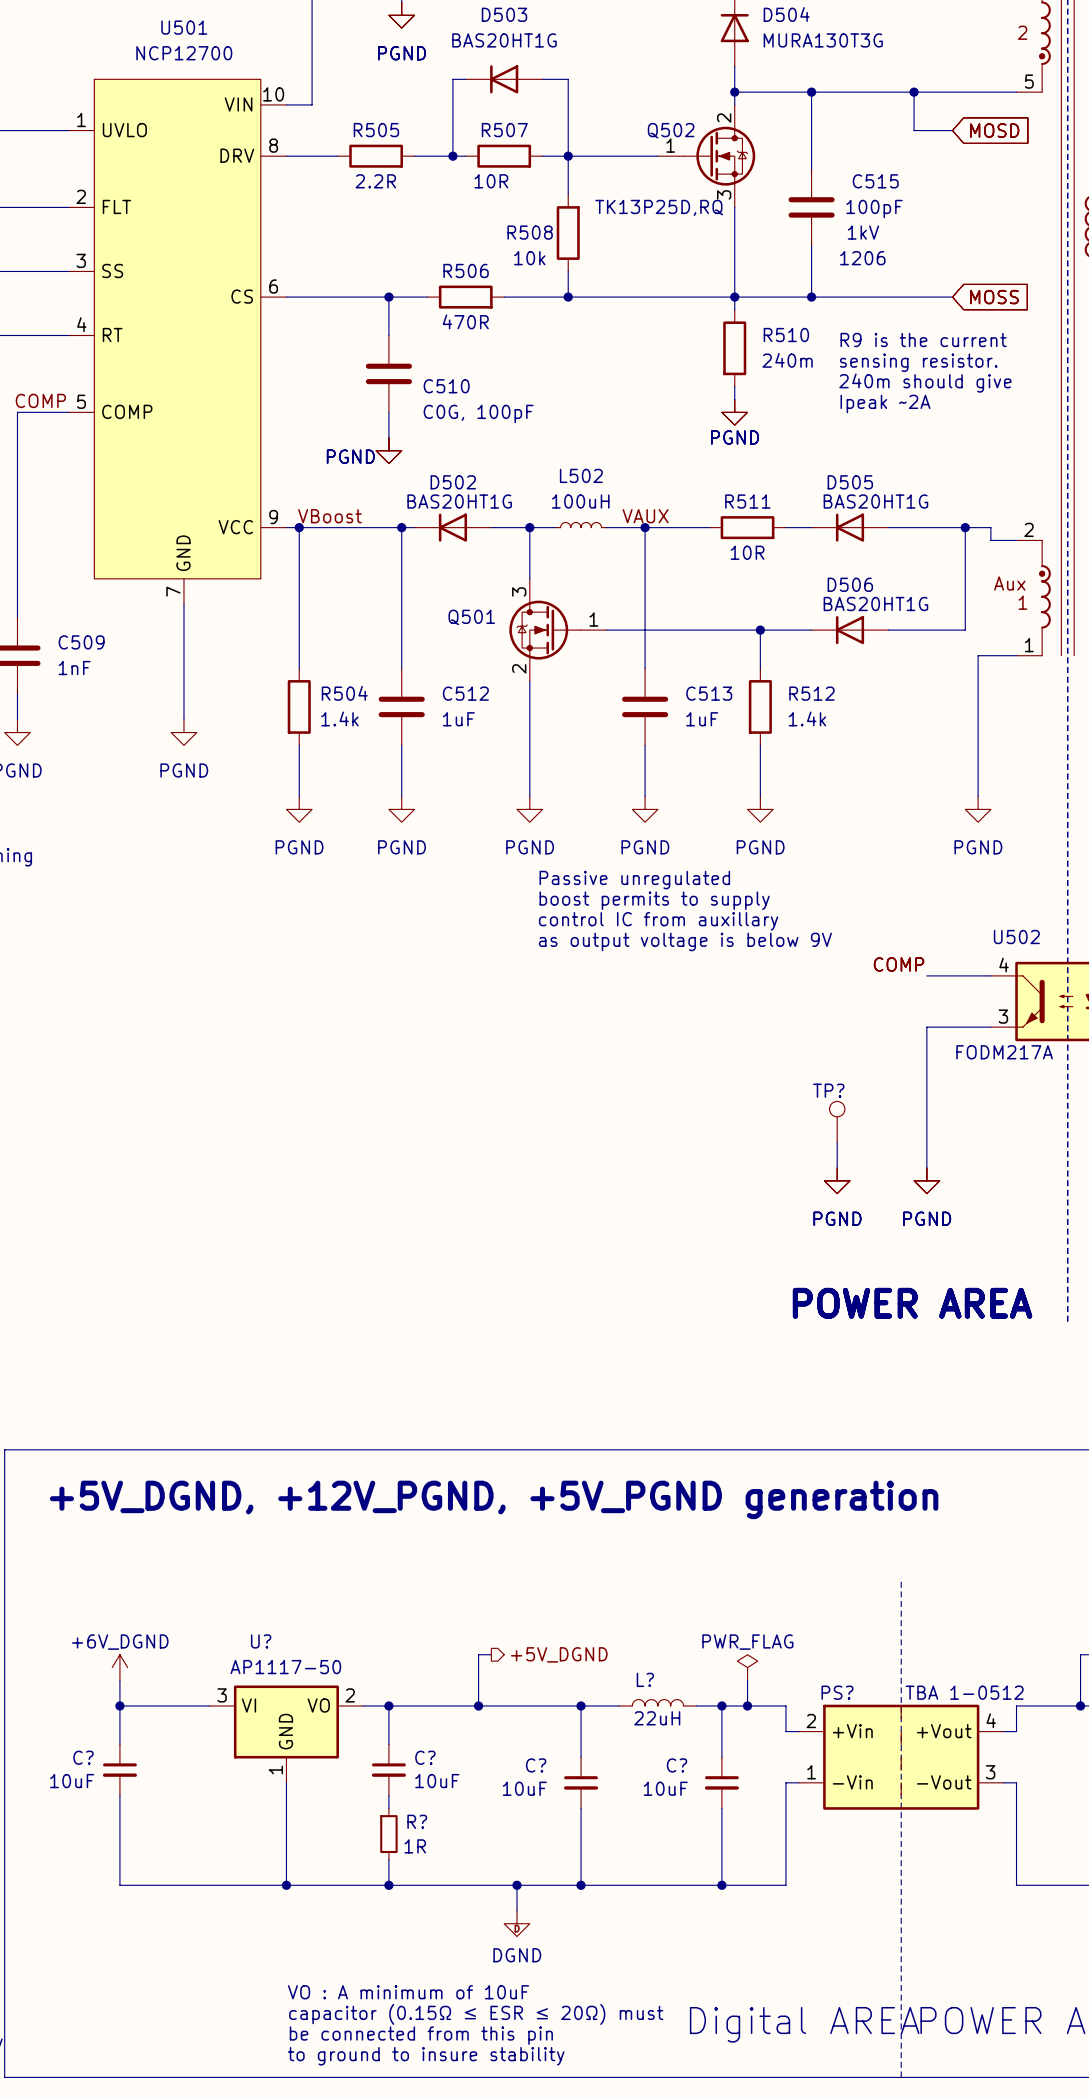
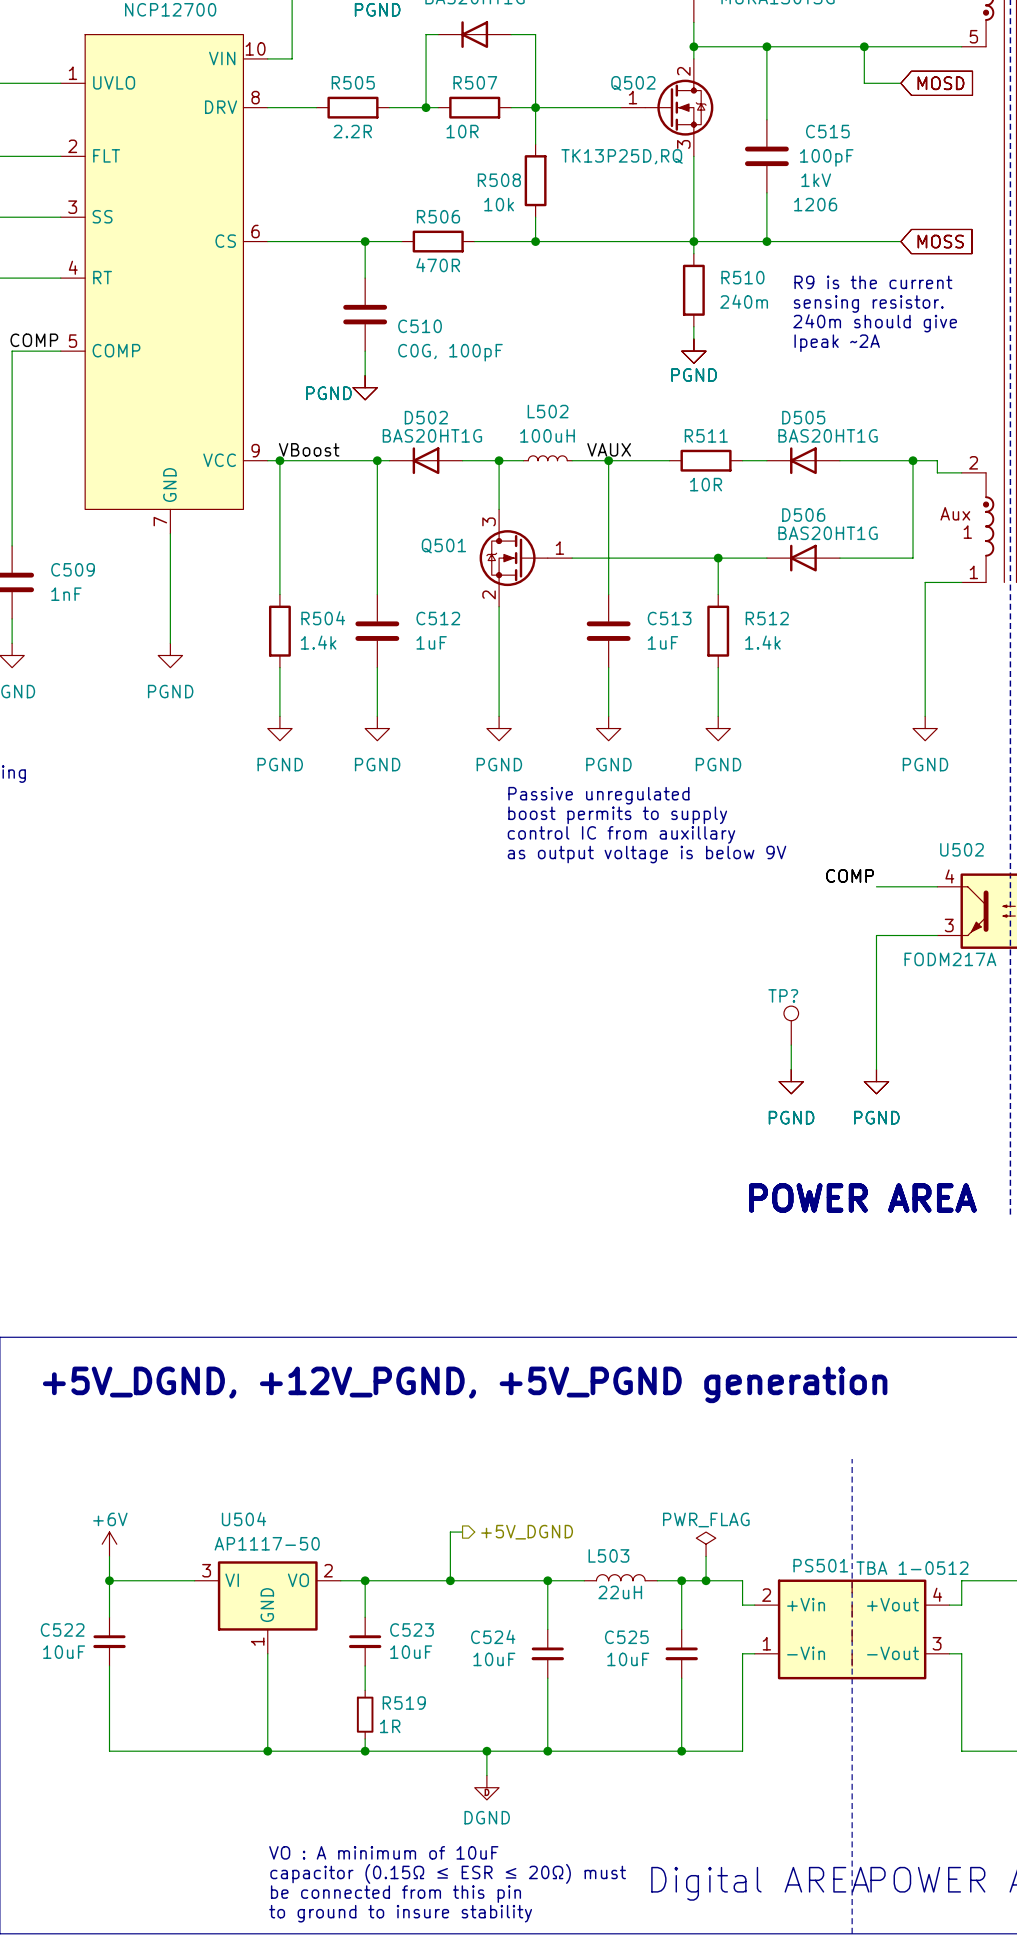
U? name: U? (261, 1641) -> U504 (243, 1519)
power symbol: +6V_DGND (119, 1667) -> +6V (109, 1544)
L? name: L? (645, 1679) -> L503 (608, 1555)
PS? name: PS? (837, 1692) -> PS501 (820, 1565)
C? name: C? (83, 1757) -> C522 (62, 1629)
C? name: C? (425, 1757) -> C523 (412, 1629)
C? name: C? (536, 1765) -> C524 (493, 1636)
C? name: C? (677, 1765) -> C525 (626, 1637)
R?: 1R (388, 1834) -> none
R519: none -> 1R (365, 1714)

